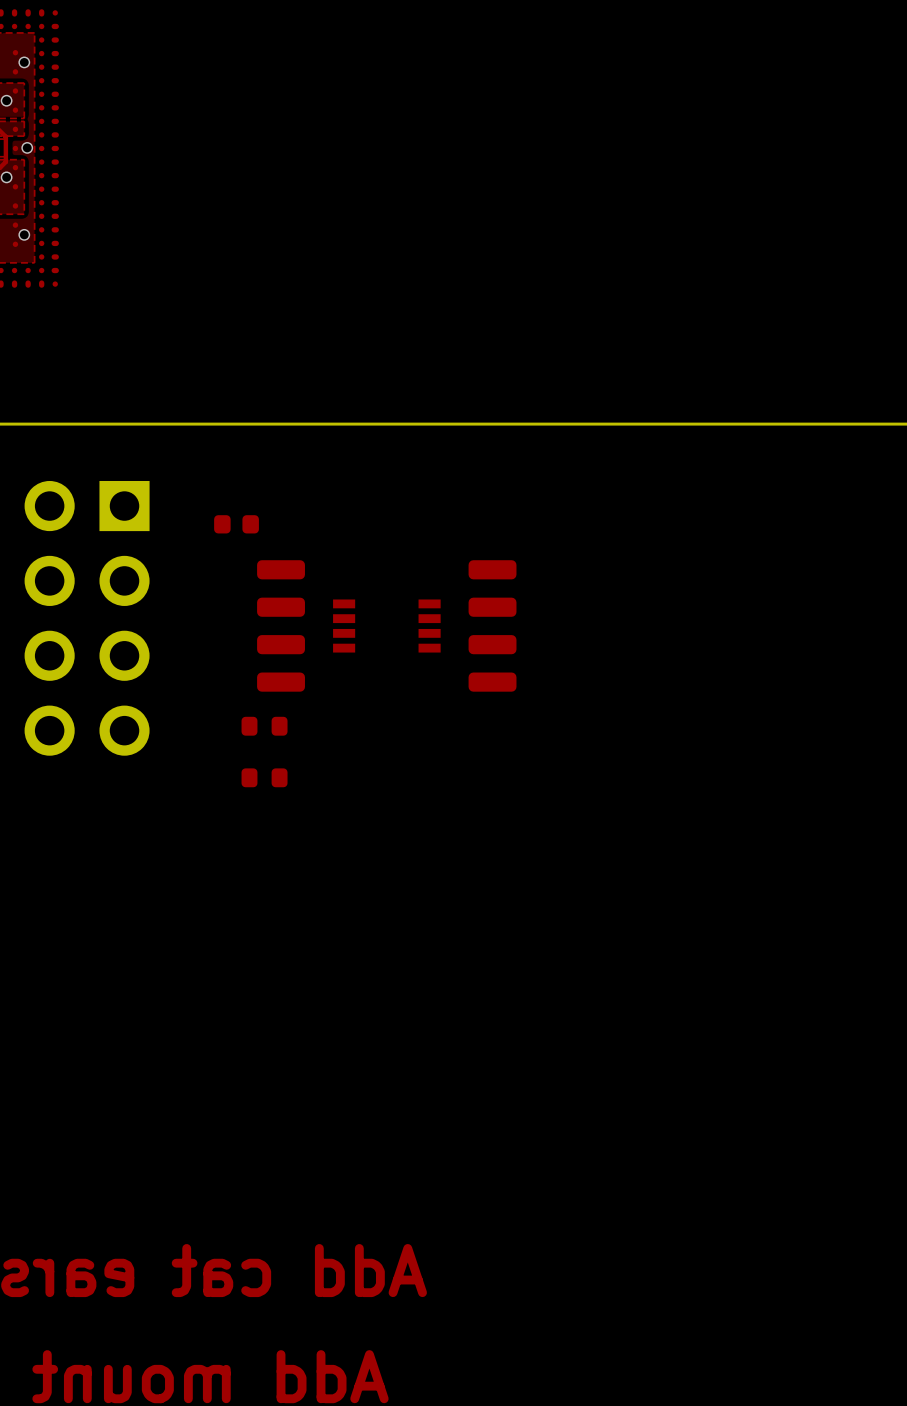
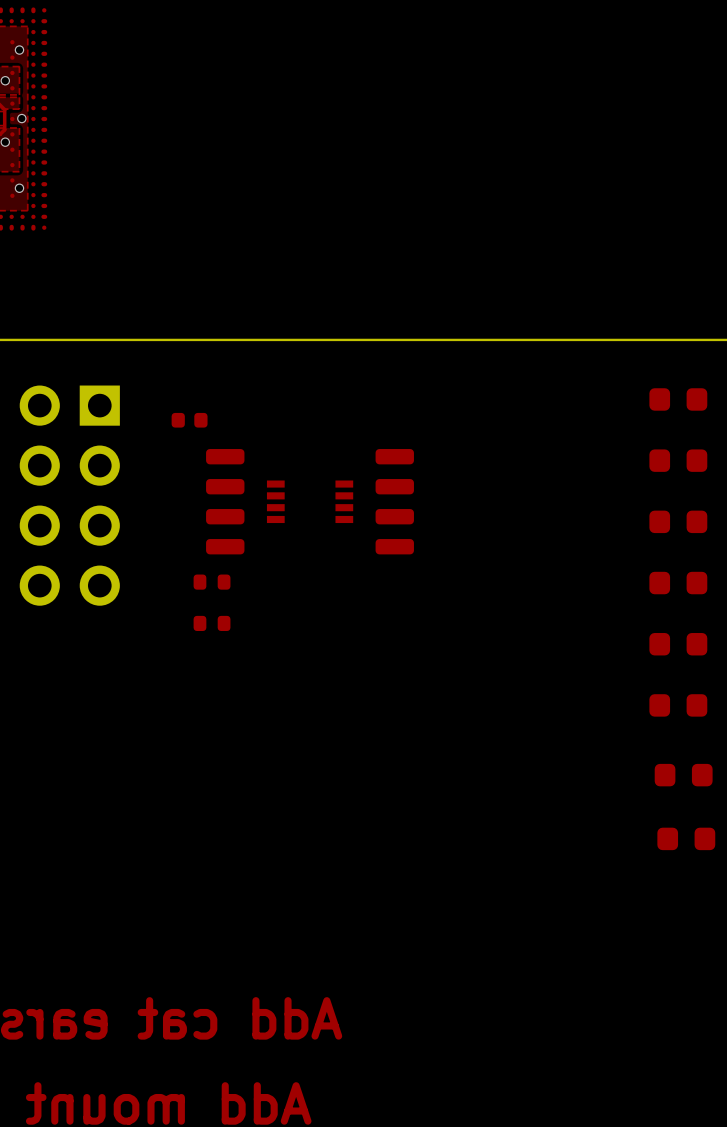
part: none -> (678, 399)
part: none -> (678, 460)
part: none -> (678, 521)
part: none -> (678, 583)
part: none -> (678, 644)
part: none -> (678, 705)
part: none -> (683, 775)
part: none -> (686, 838)

